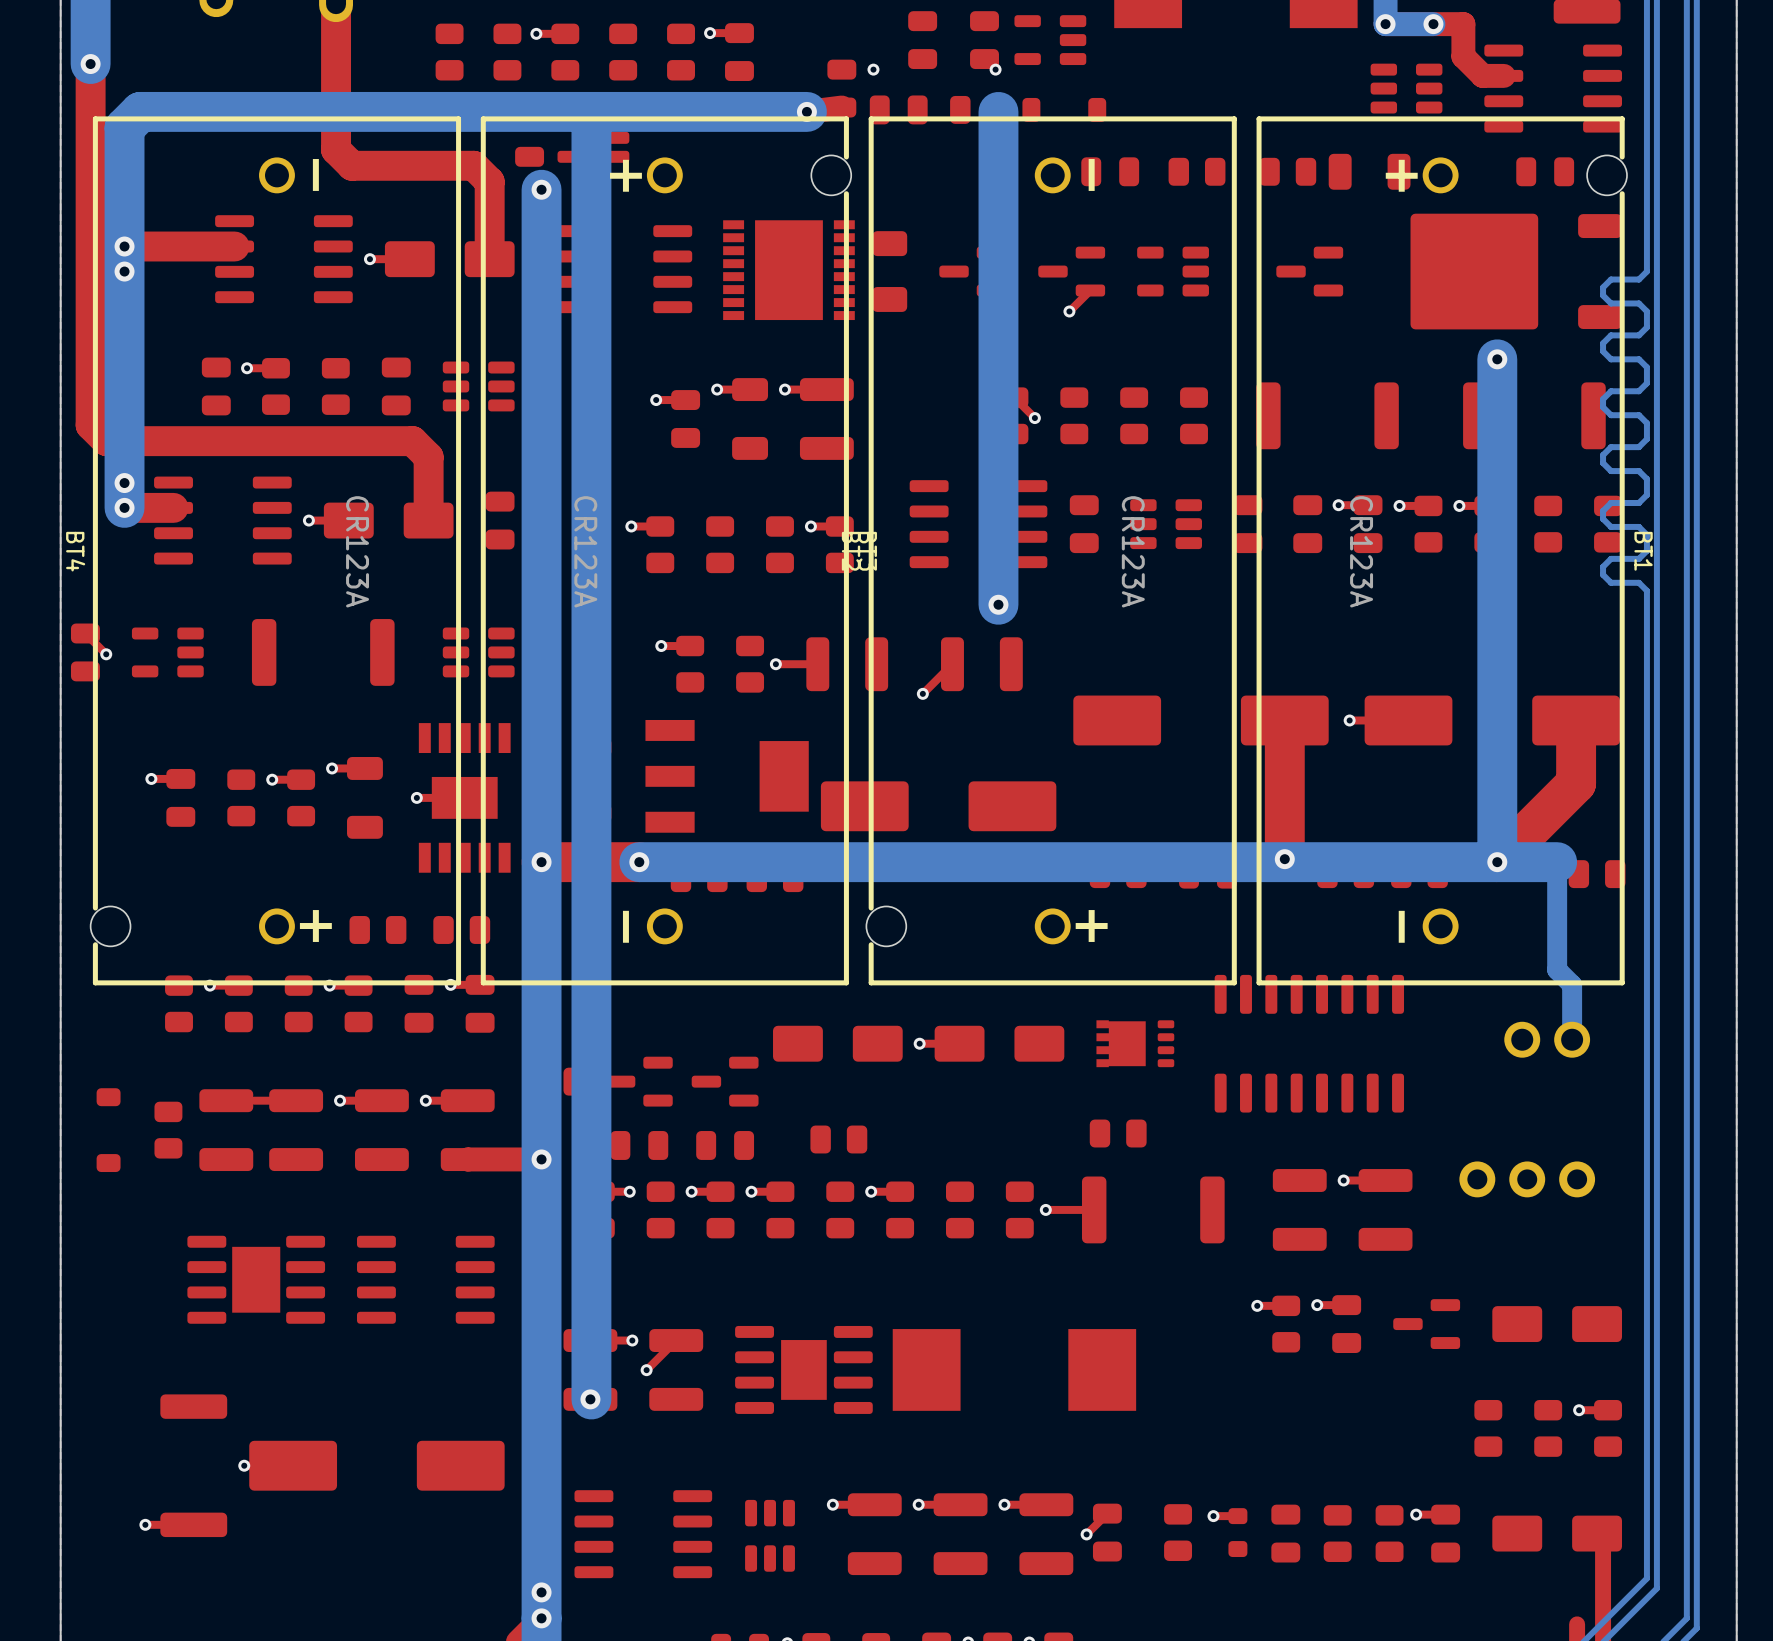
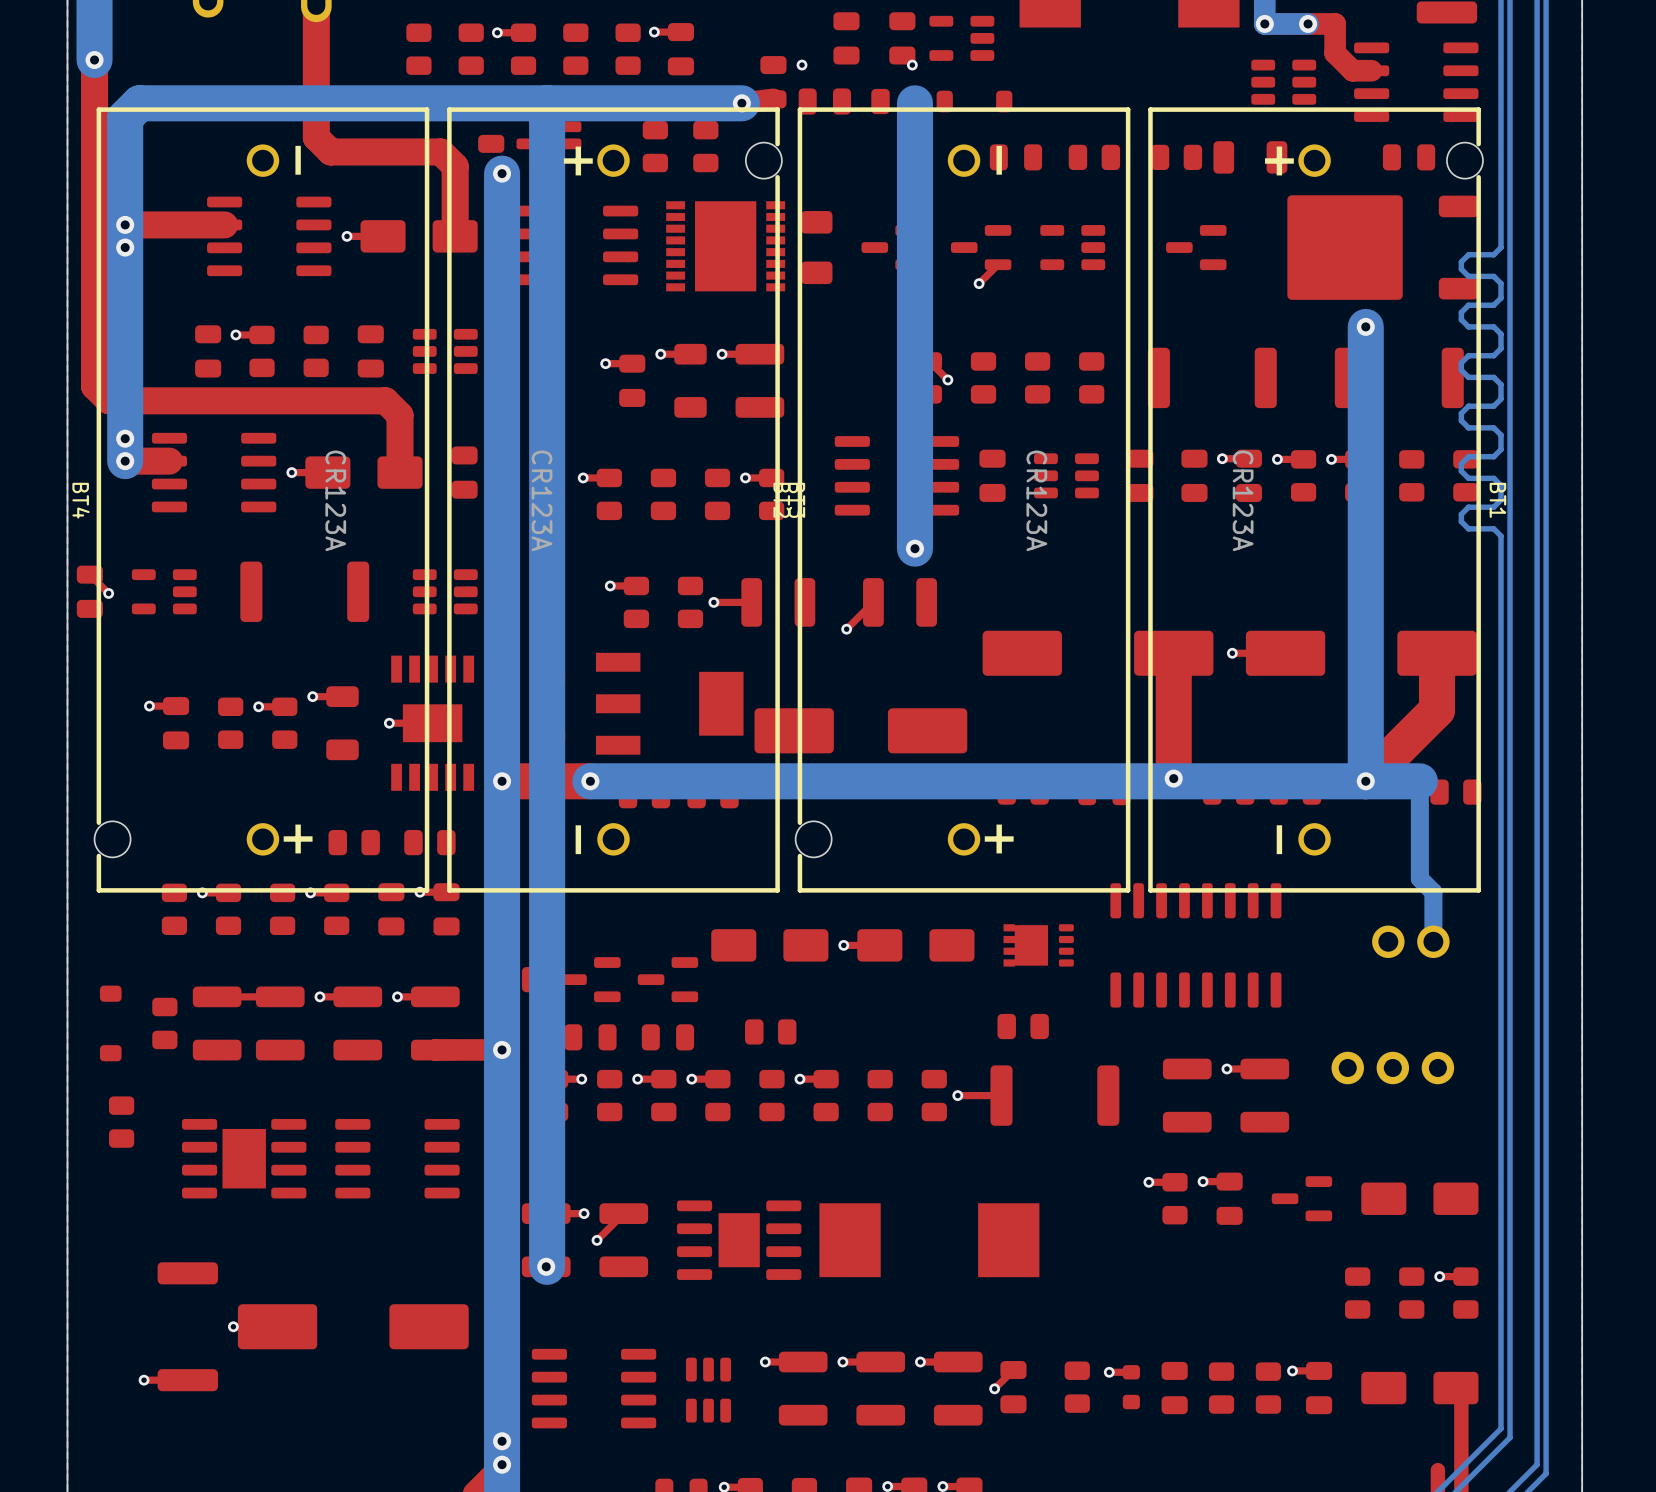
part: none -> (655, 146)
part: none -> (705, 146)
part: none -> (121, 1122)

